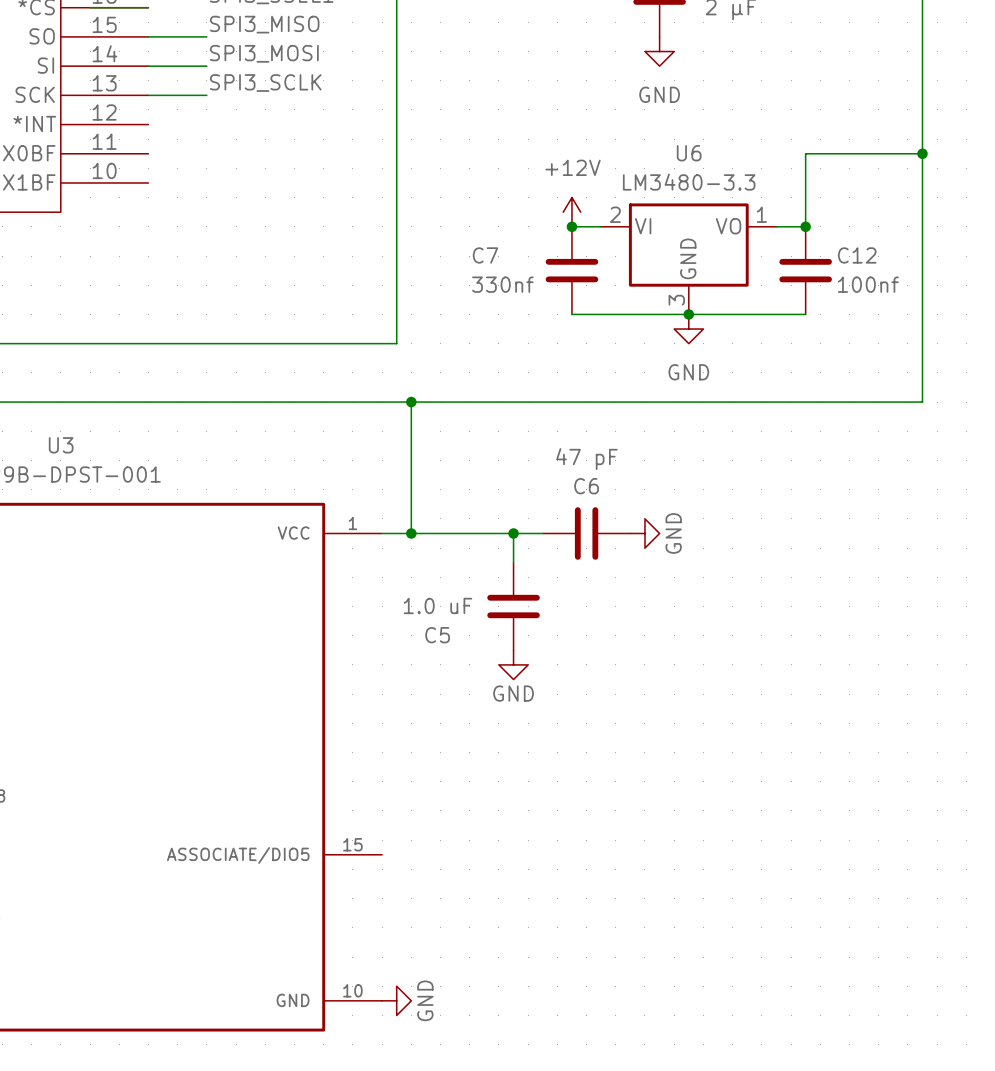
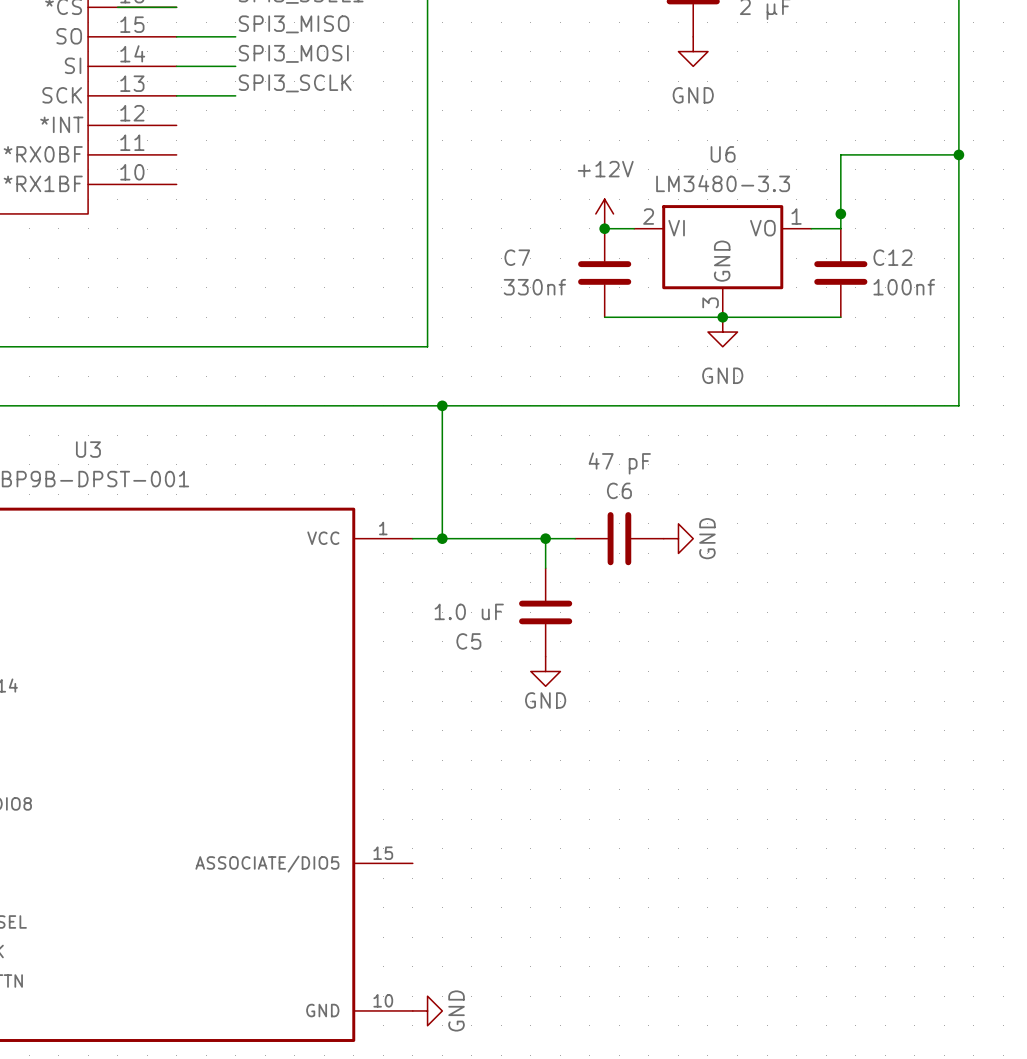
junction position: (805, 226) -> (840, 213)

